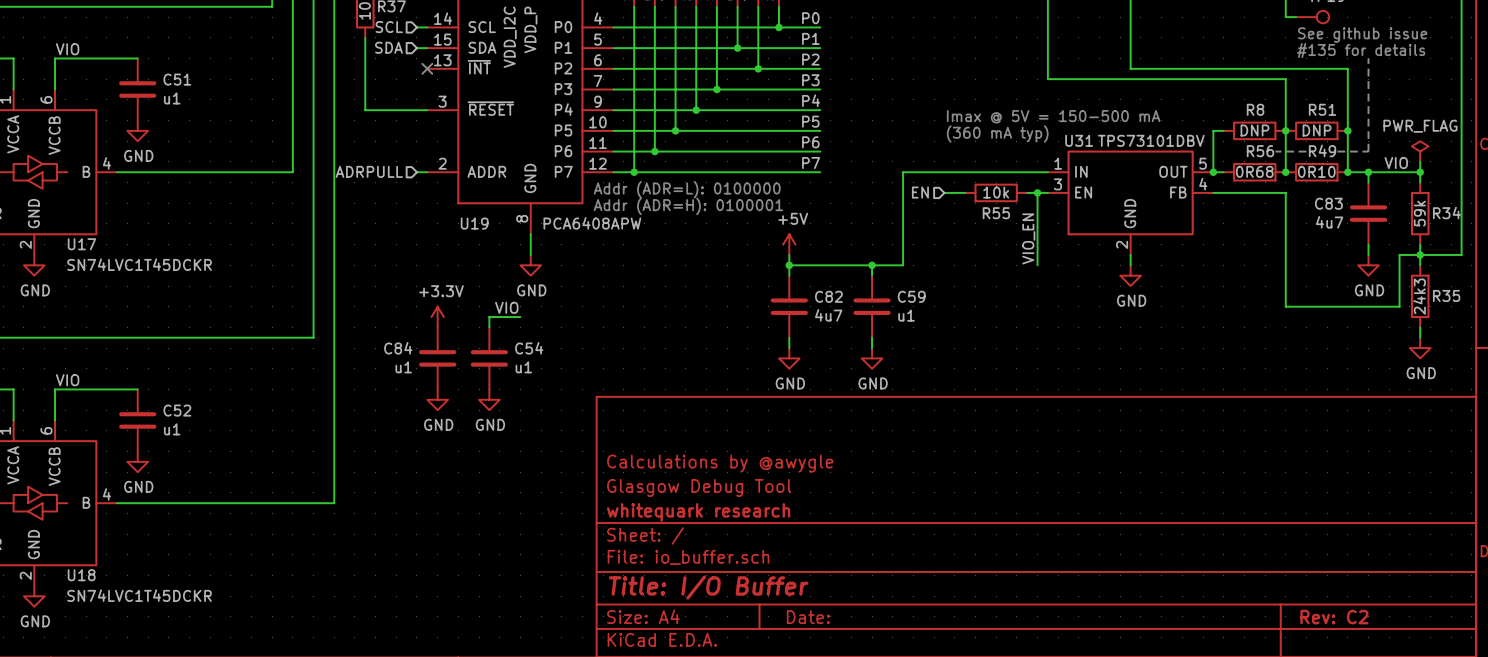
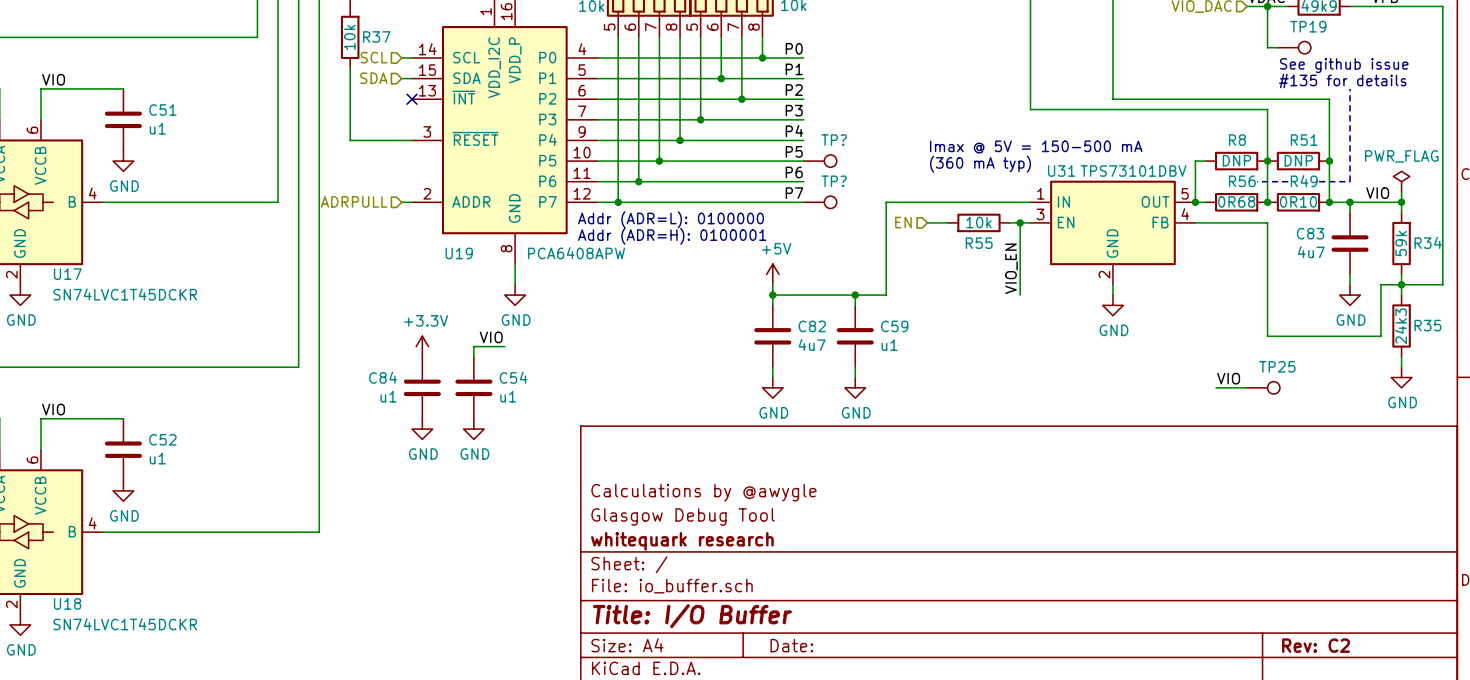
TP?: none -> (820, 161)
TP?: none -> (820, 202)
label: none -> VIO (1228, 378)
wire: none -> (1216, 387) (1246, 387)
TP25: none -> (1263, 387)

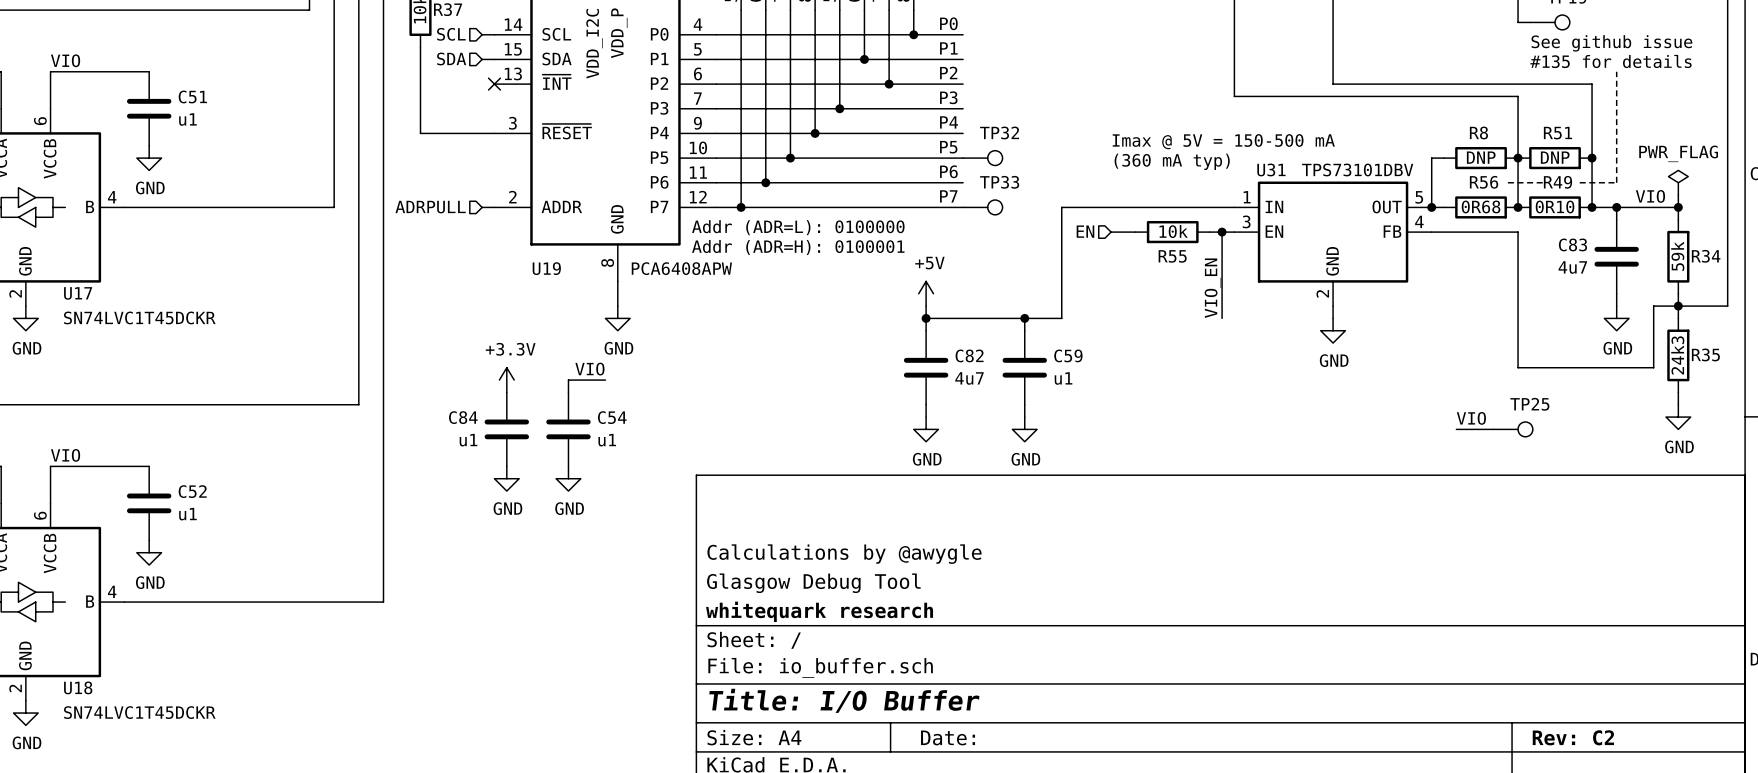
TP? name: TP? (834, 140) -> TP32 (999, 132)
TP? name: TP? (834, 181) -> TP33 (999, 182)

